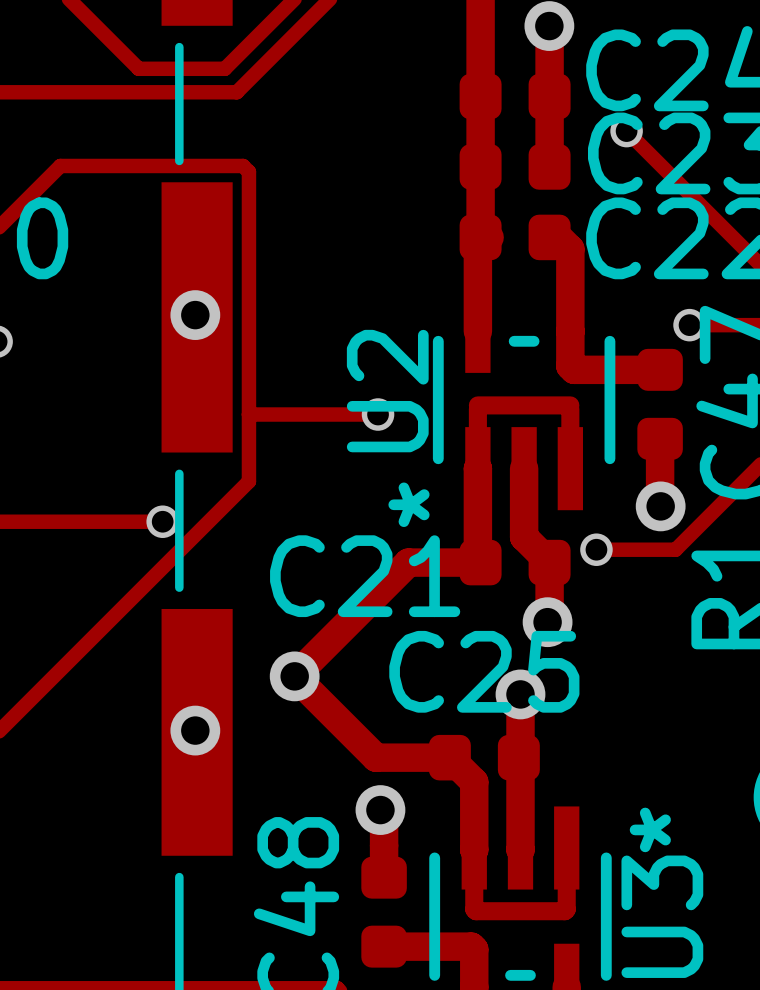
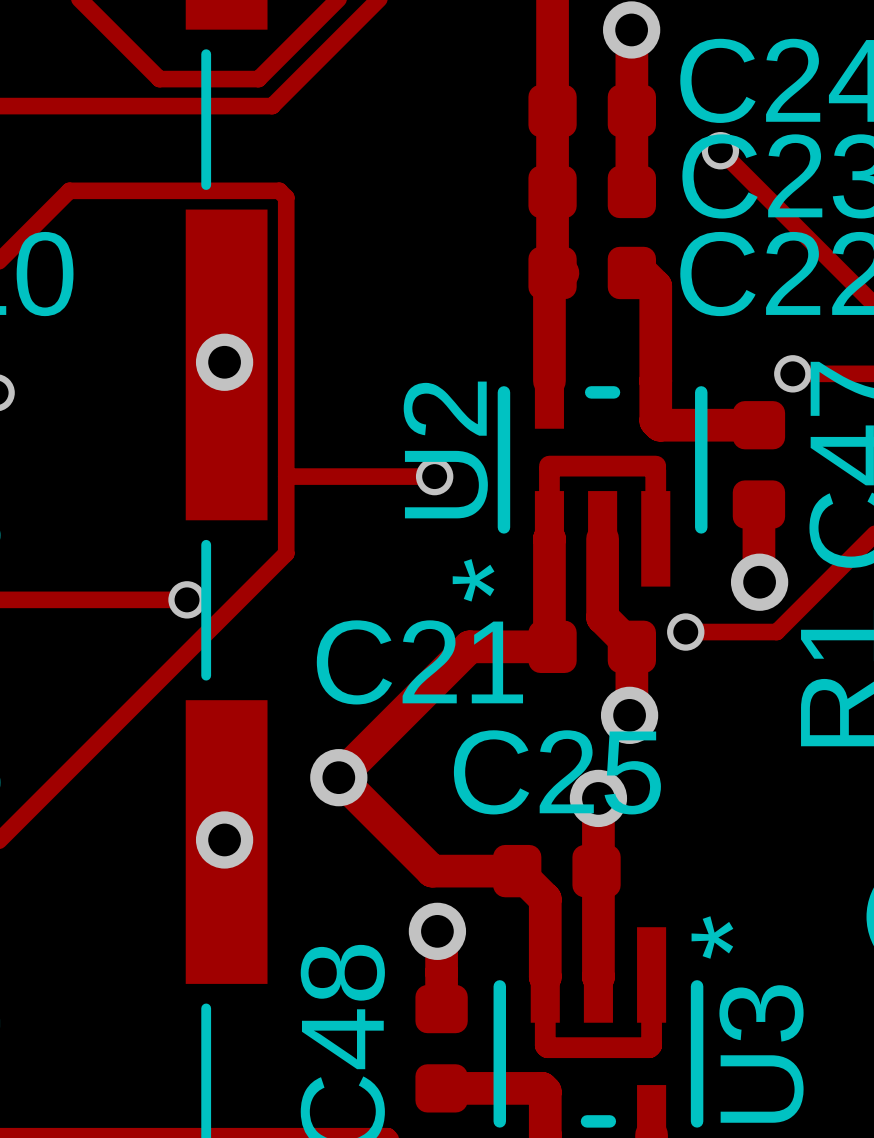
U3 text position: * (650, 829) -> * (712, 937)

